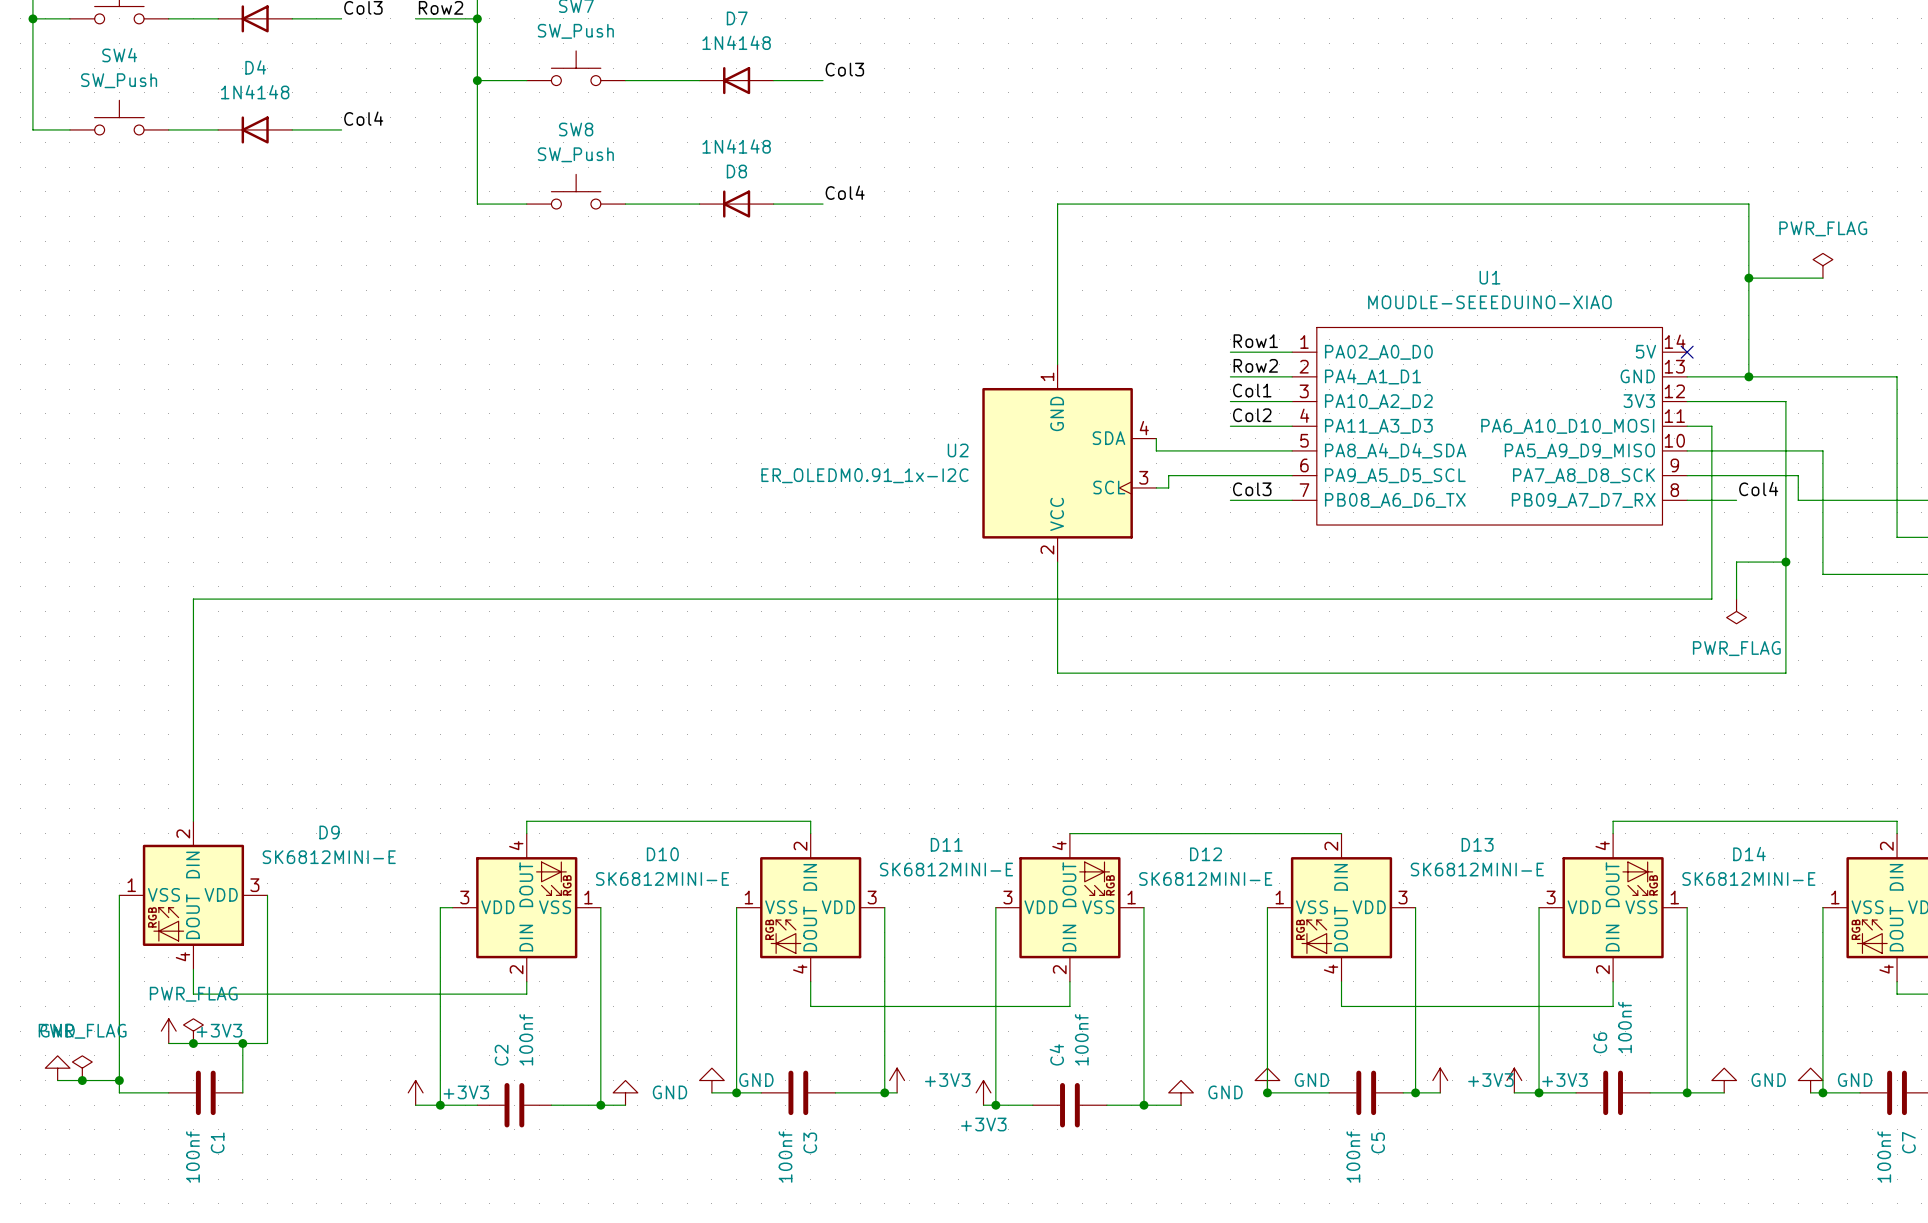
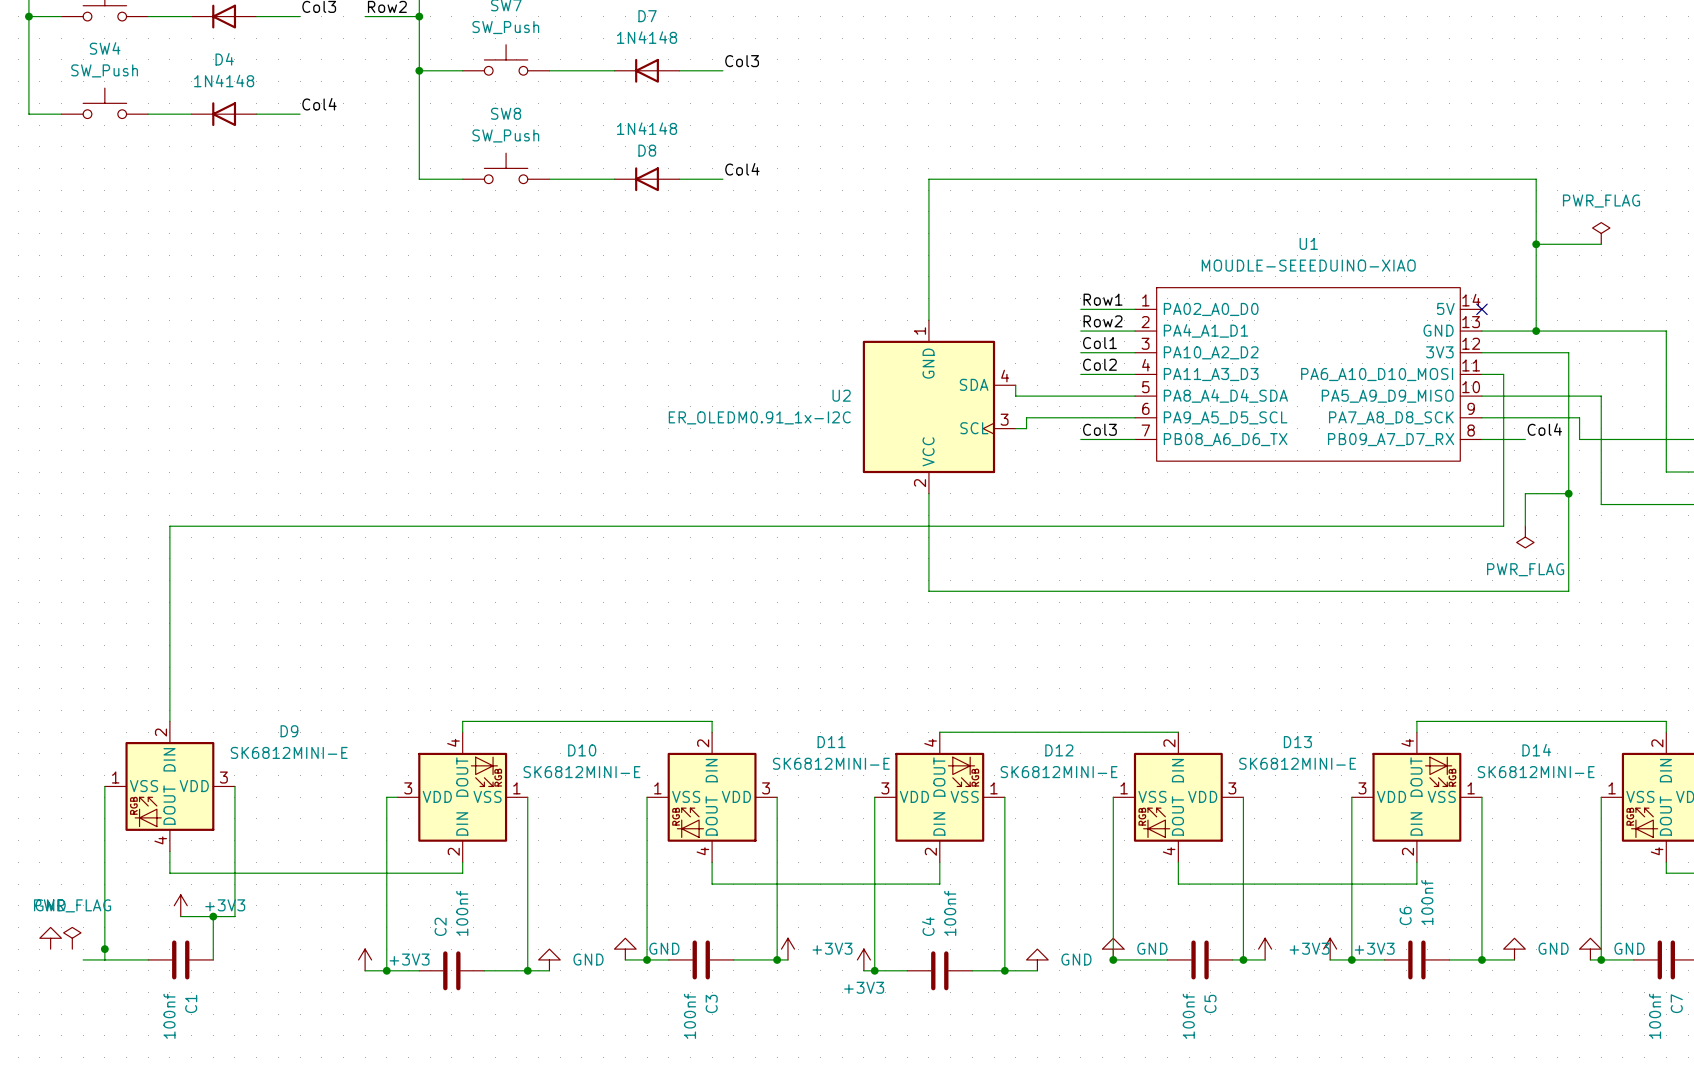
power symbol position: +3V3 (168, 1031) -> +3V3 (180, 905)
power symbol: PWR_FLAG (193, 1031) -> none
wire: (168, 1043) (205, 1043) -> none
junction: (193, 1043) -> none
wire: (57, 1080) (119, 1080) -> none
junction: (82, 1080) -> none
wire: none -> (83, 959) (104, 959)

